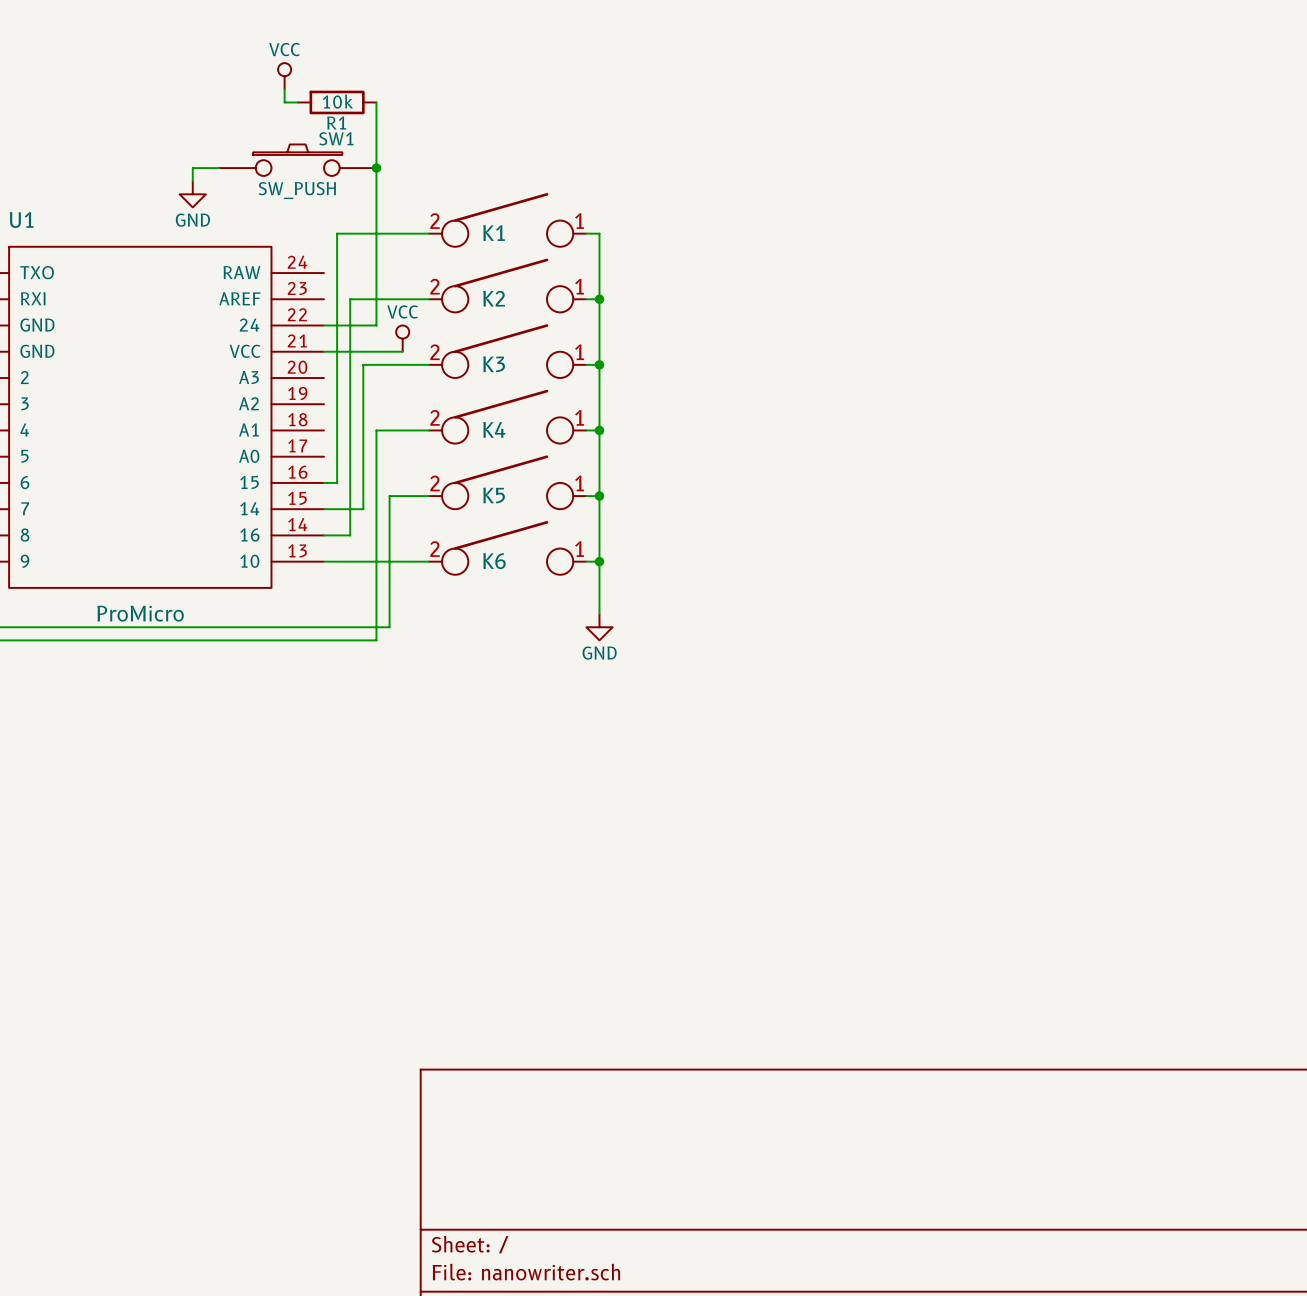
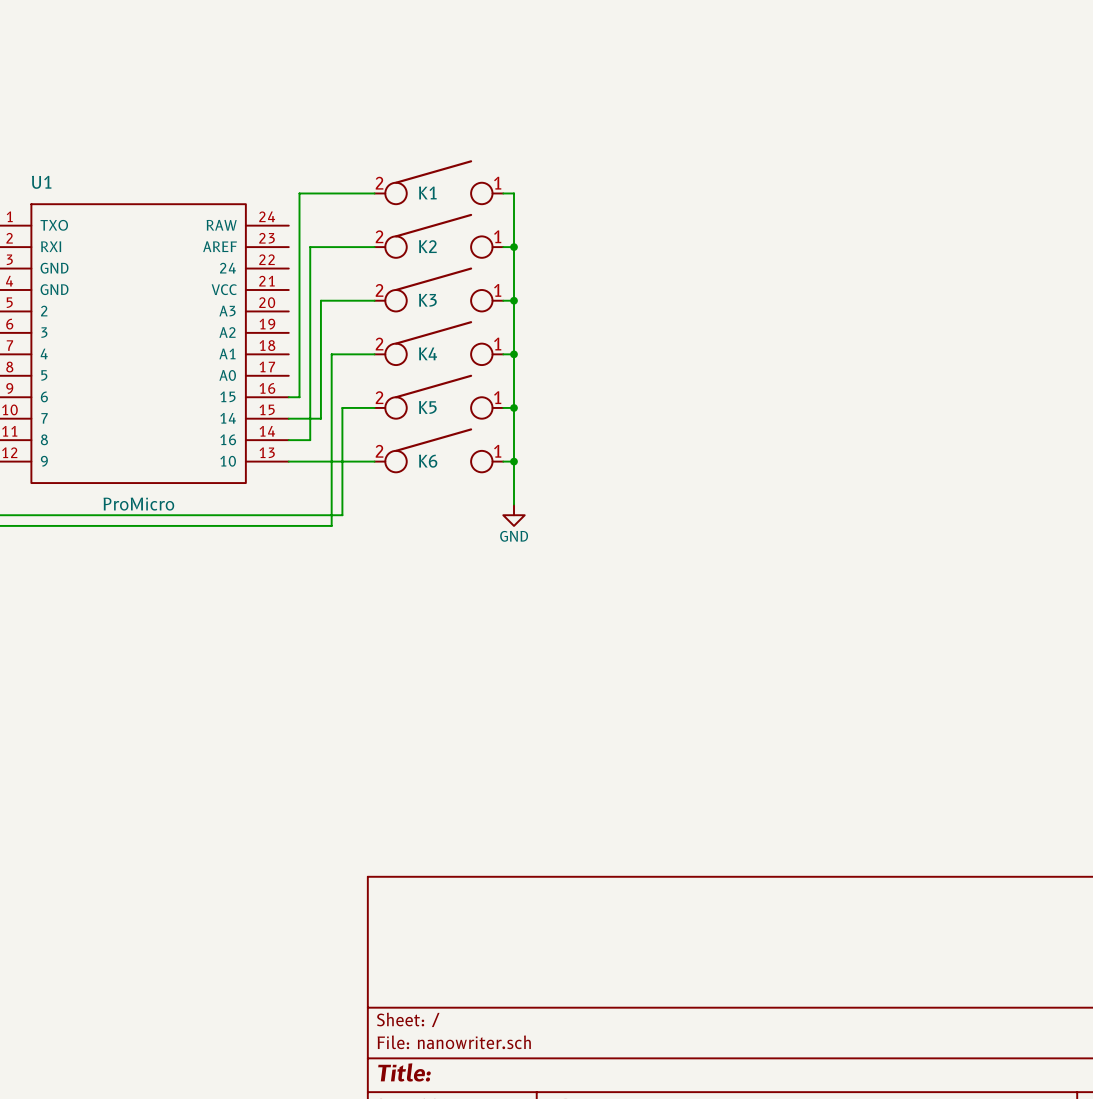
power symbol: VCC (284, 76) -> none
wire: (284, 89) (284, 102) (297, 102) -> none
R1: 10k (337, 102) -> none
wire: (376, 102) (376, 325) (323, 325) -> none
SW1: SW_PUSH (297, 160) -> none
wire: (219, 168) (192, 168) (192, 181) -> none
junction: (376, 168) -> none
power symbol: GND (192, 194) -> none
power symbol: VCC (402, 338) -> none
wire: (323, 351) (402, 351) -> none

